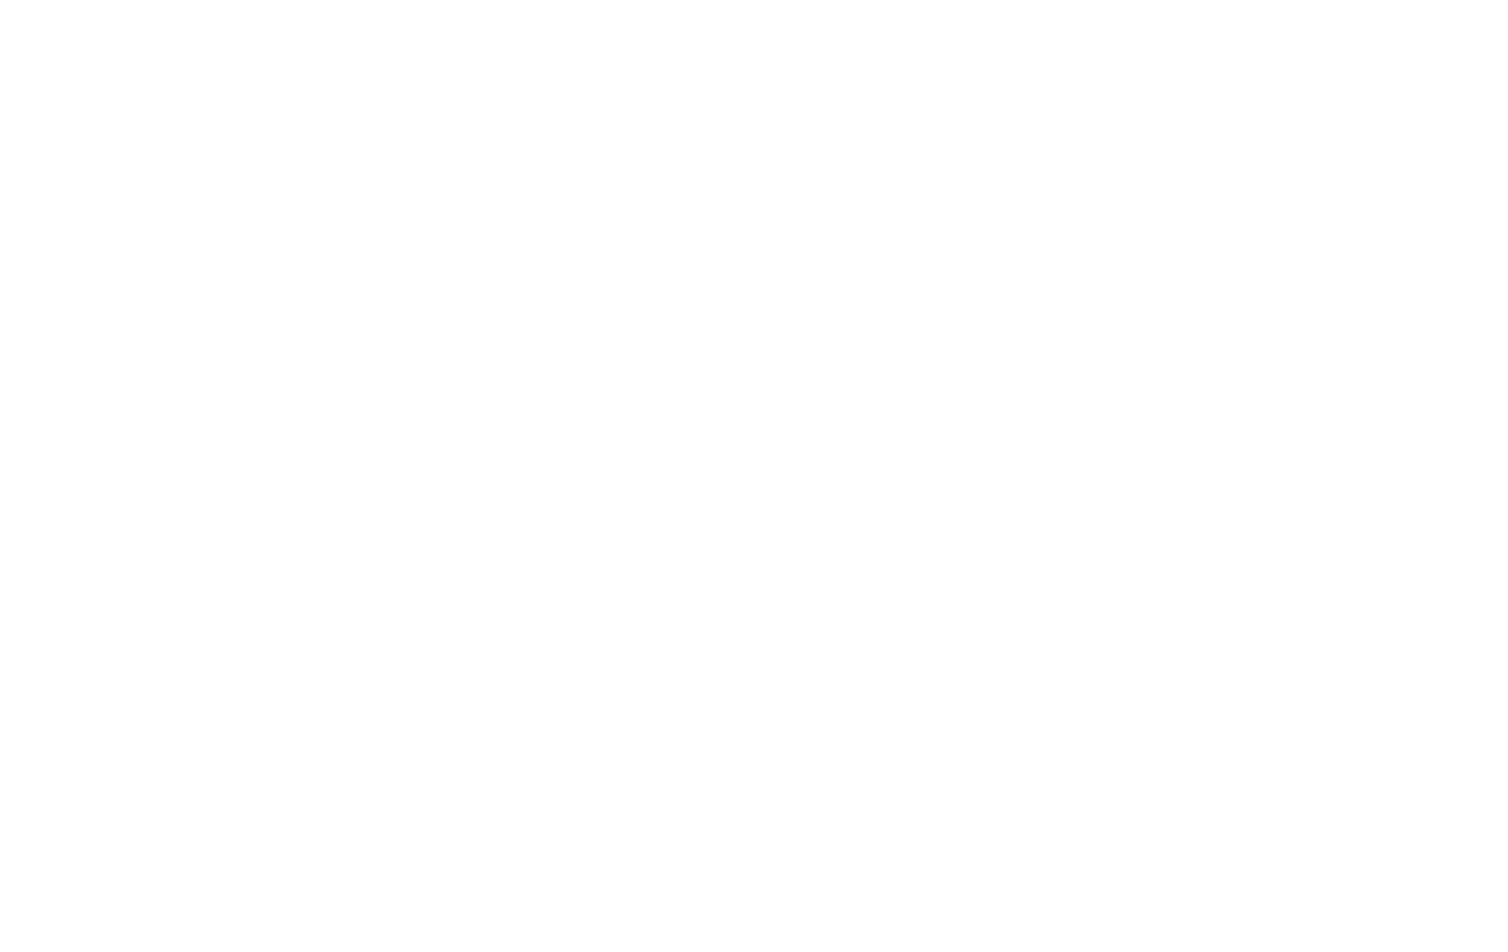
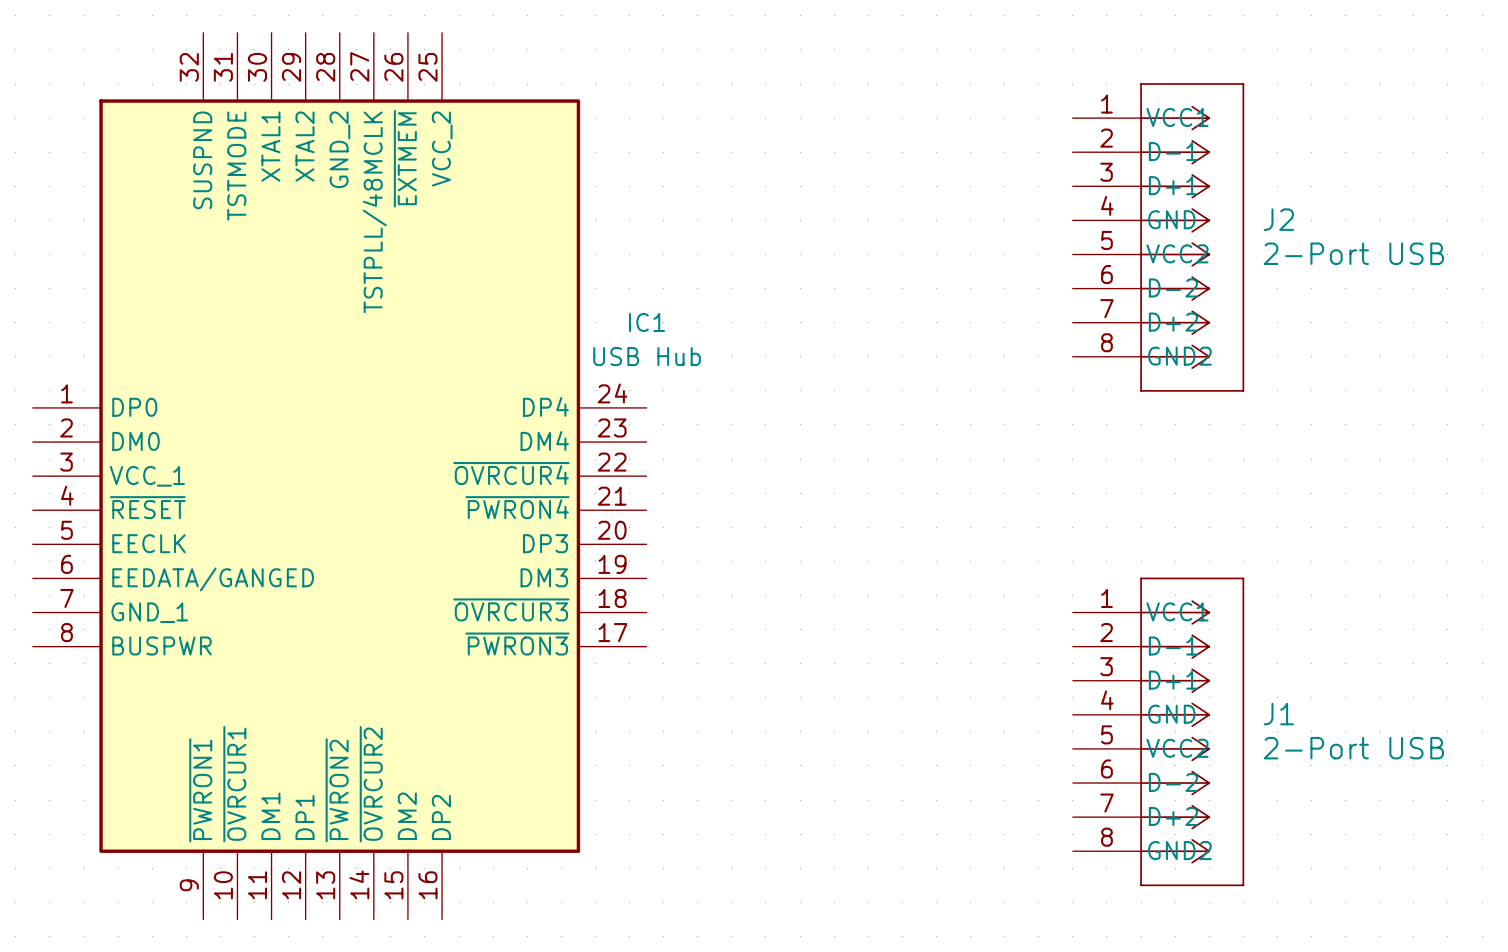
J2: none -> 2-Port USB (1158, 237)
IC1: none -> USB Hub (339, 476)
J1: none -> 2-Port USB (1158, 731)

